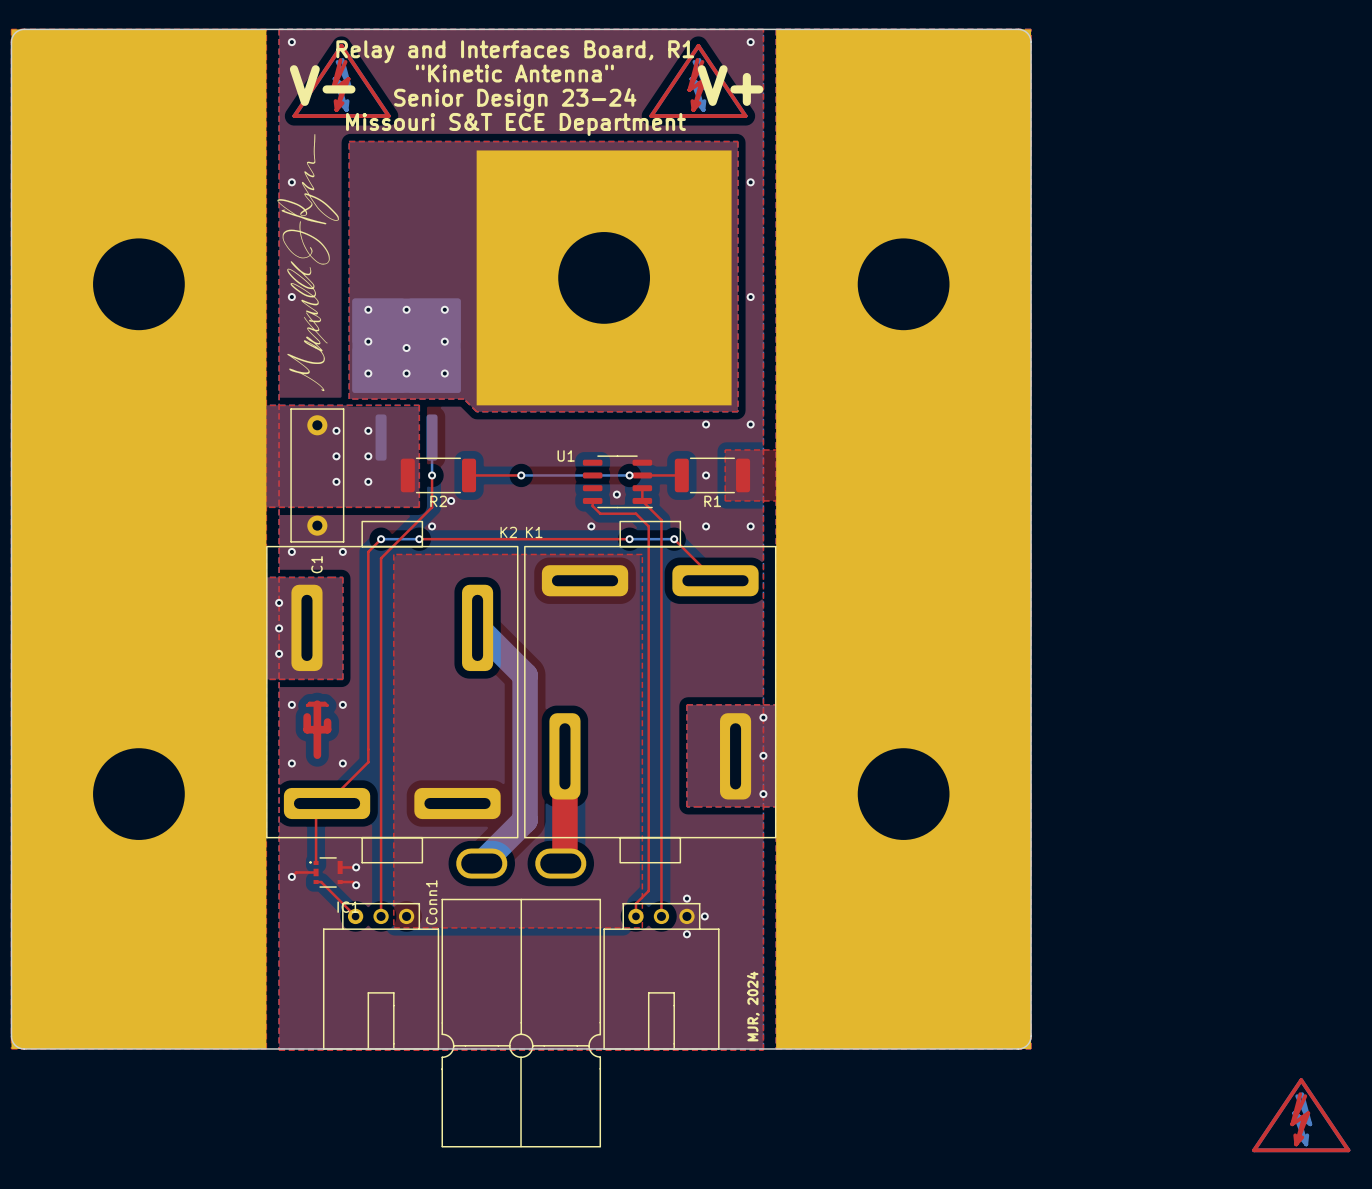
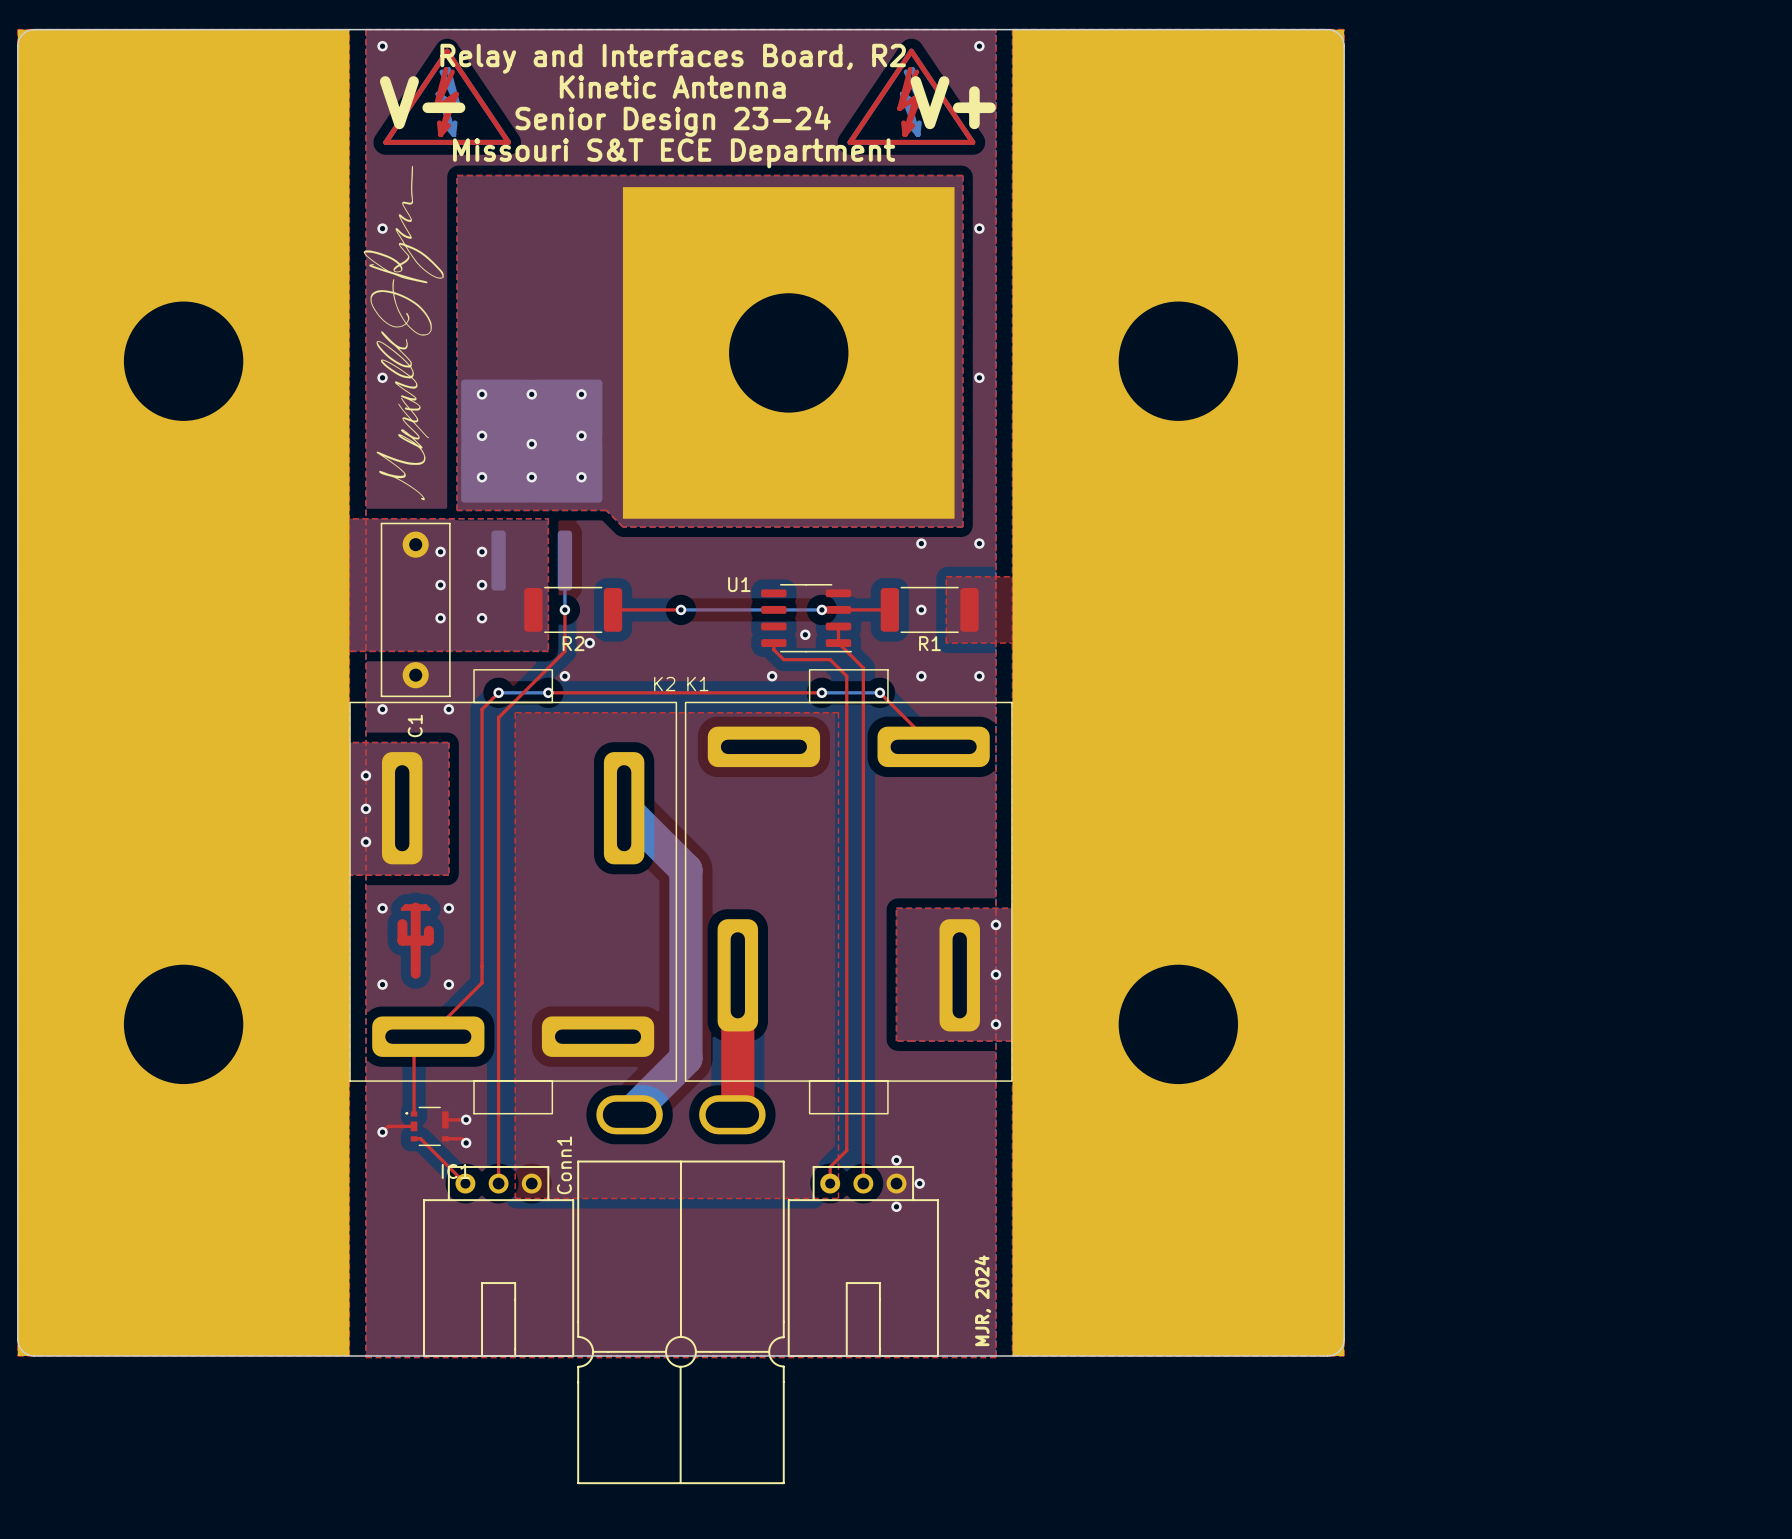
text: Relay and Interfaces Board, R1 (515, 51) -> Relay and Interfaces Board, R2 (673, 58)
text: "Kinetic Antenna" (514, 73) -> Kinetic Antenna (672, 87)
drawing: [1252, 1078, 1351, 1153] -> none

